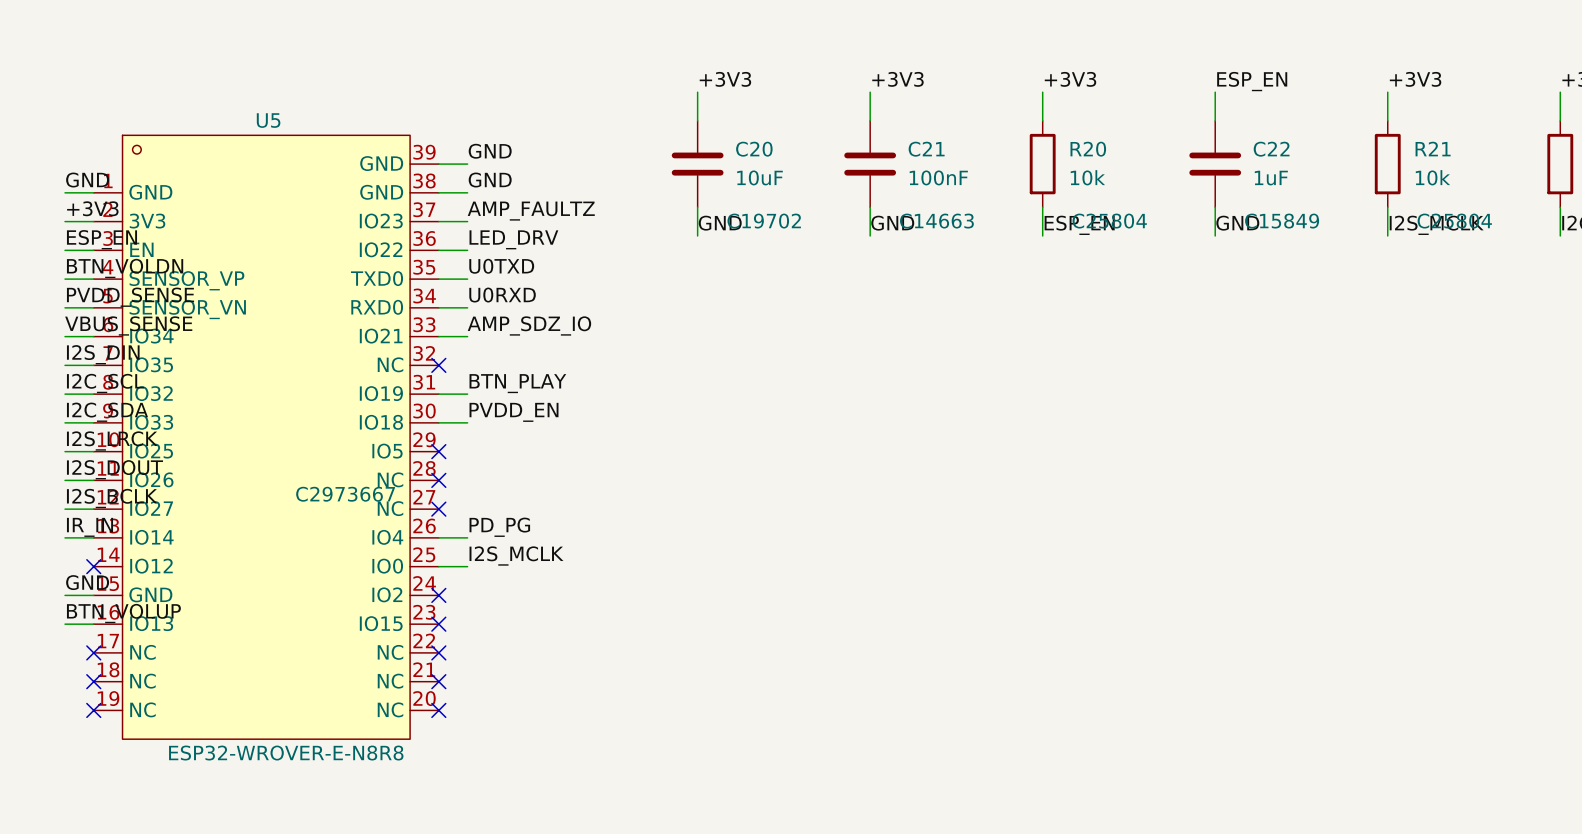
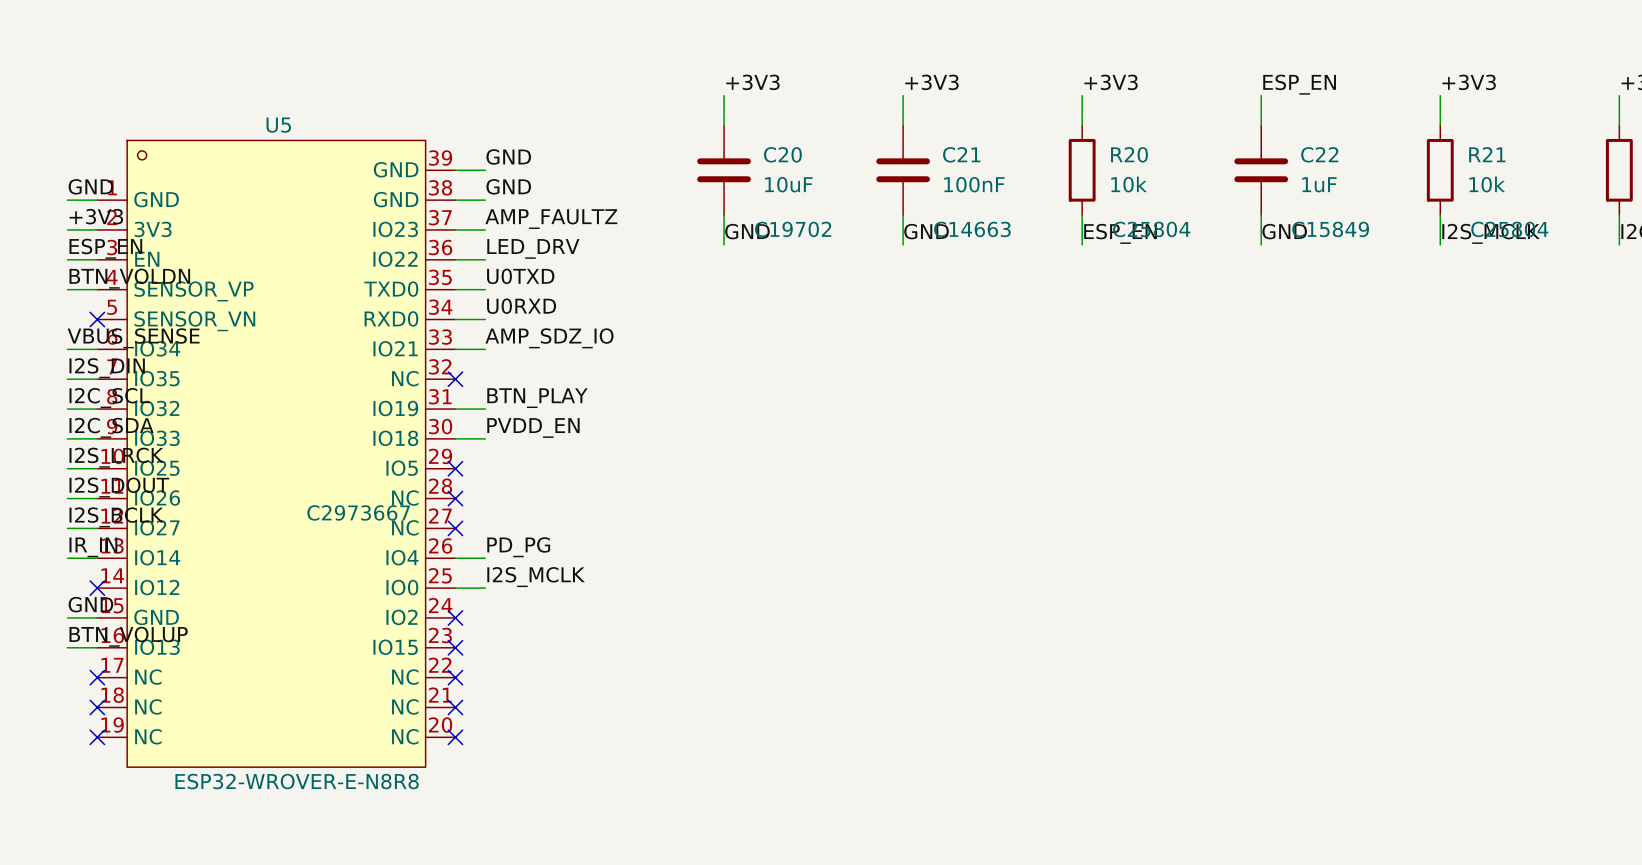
label: PVDD_SENSE (130, 297) -> none
wire: (65, 307) (93, 307) -> none
no-connect mark: none -> (97, 319)

